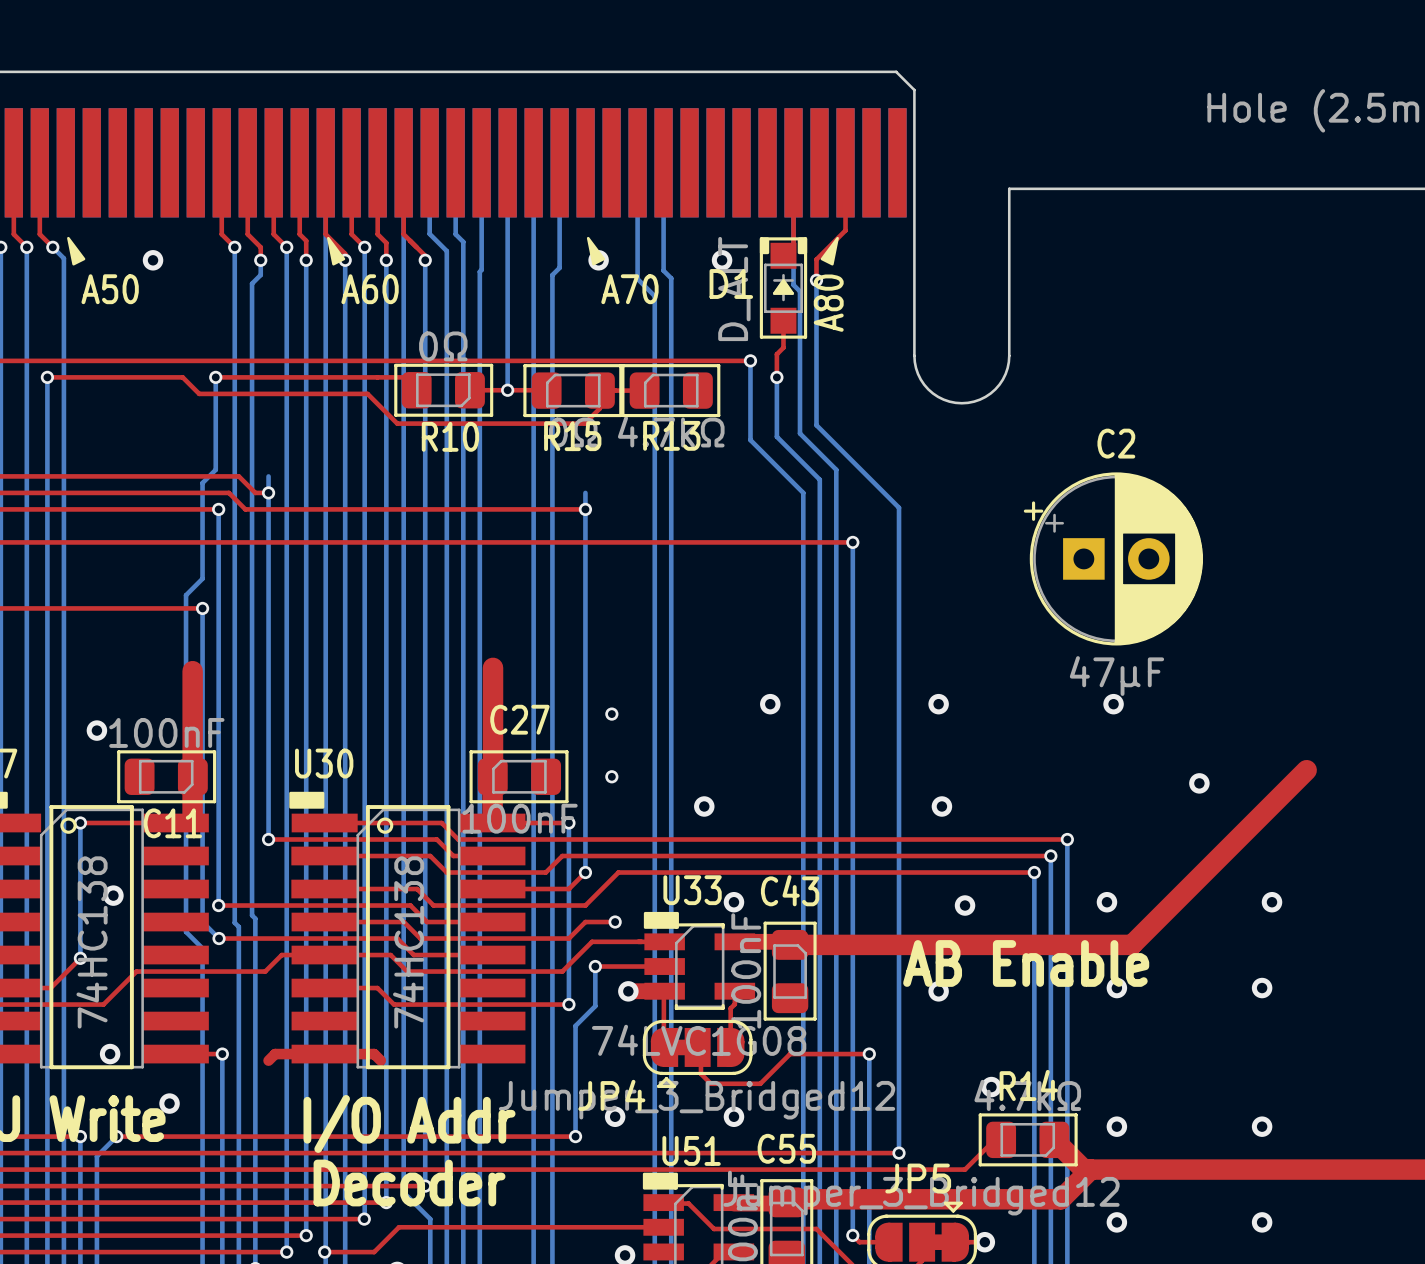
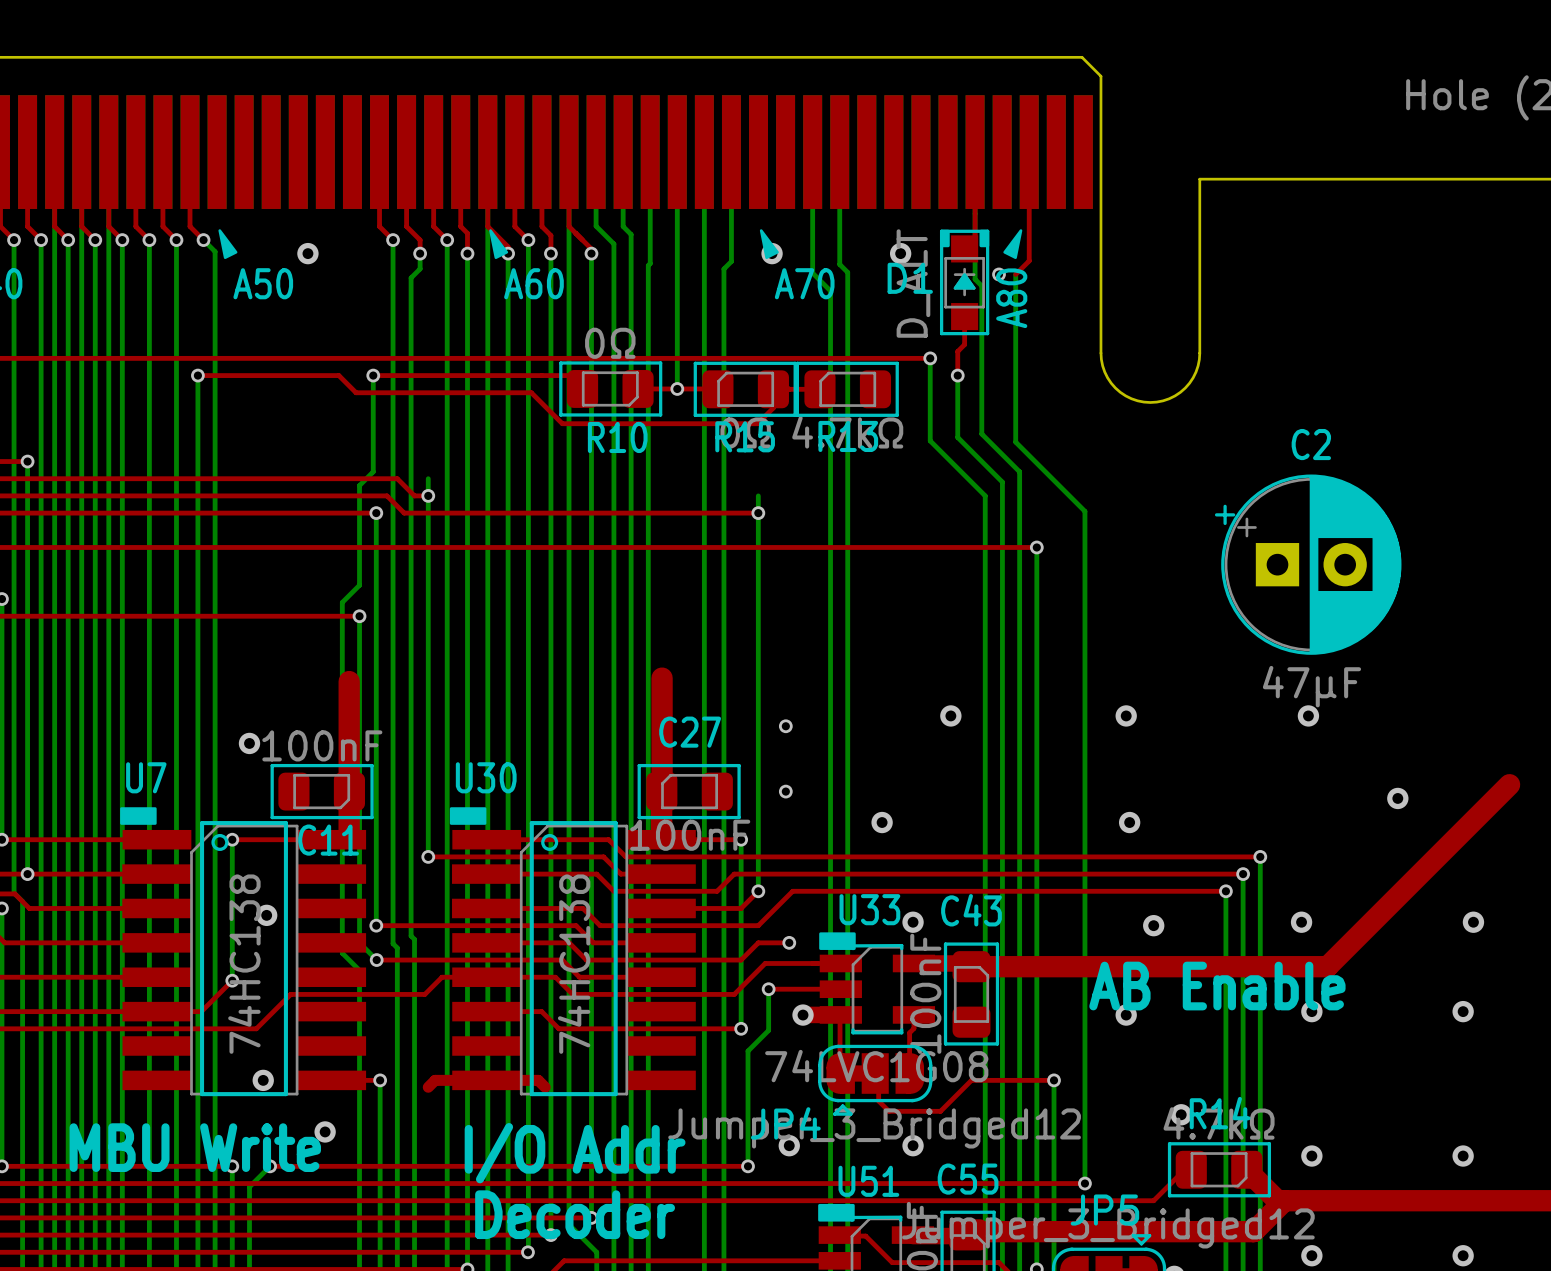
top track: (845, 230) (816, 259) (816, 280) -> (1029, 222) (1029, 260) (1015, 274)
bottom track: (816, 280) (816, 425) (832, 441) -> (1015, 274) (1015, 442)

